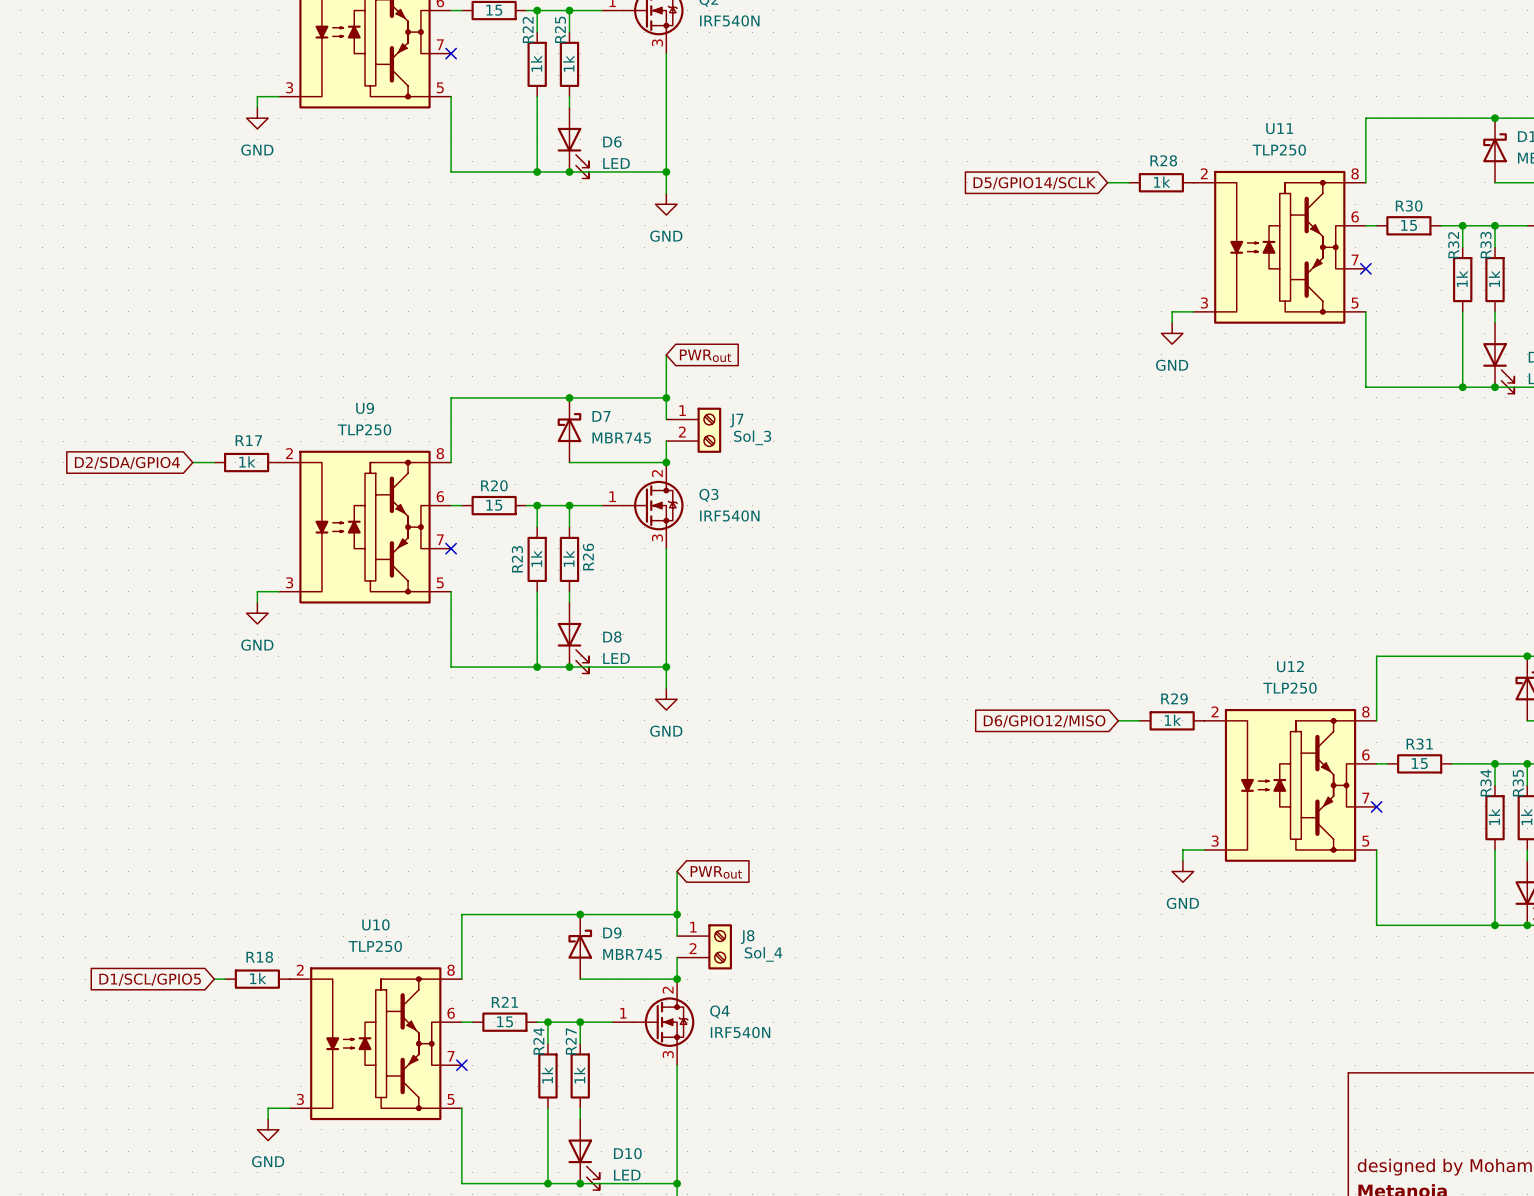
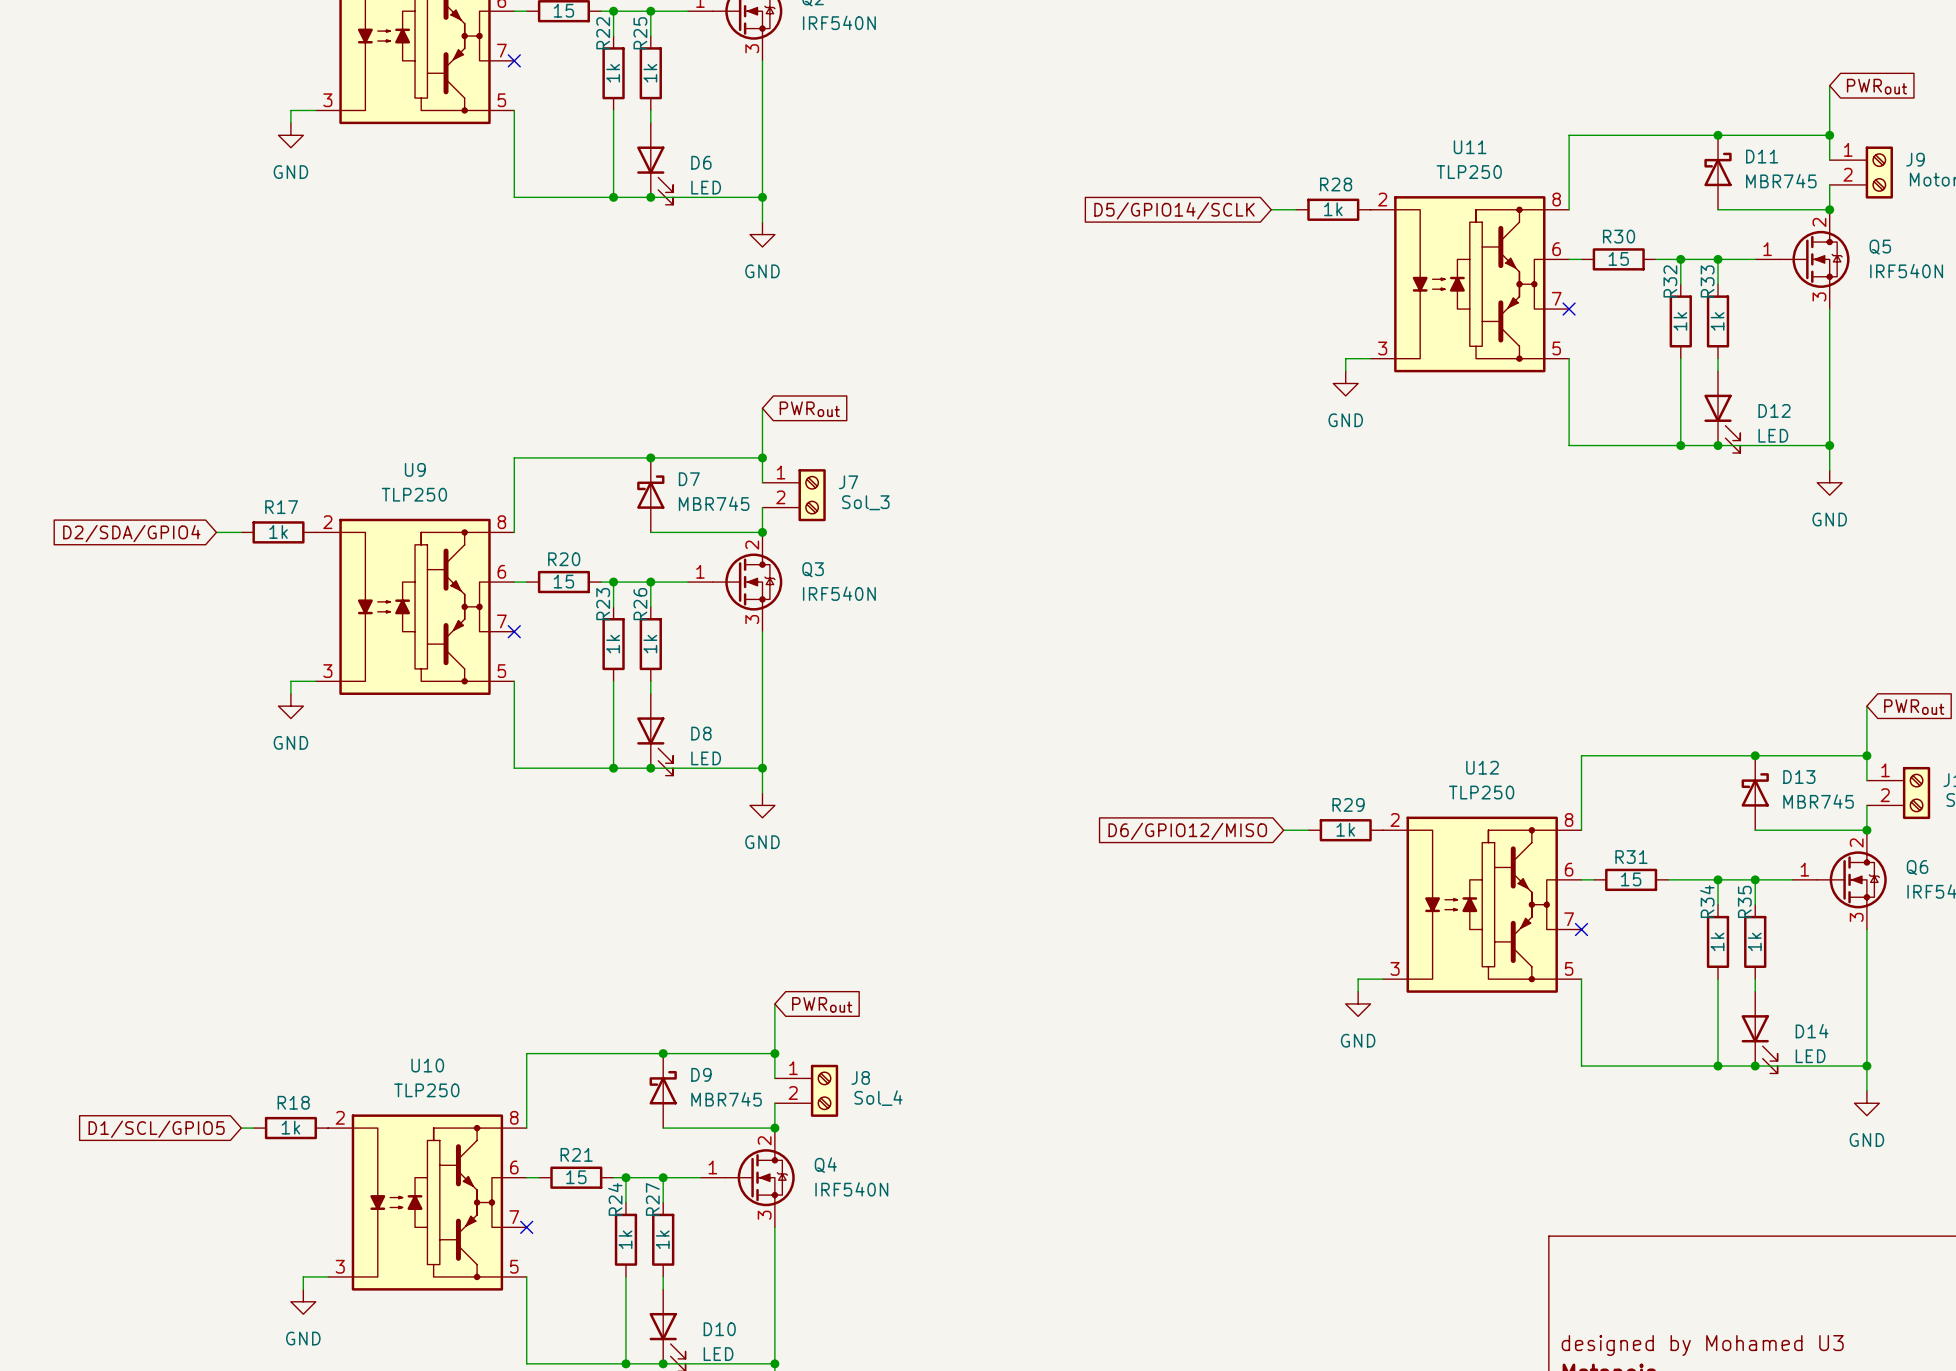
R26 name position: R26 (588, 556) -> R26 (640, 604)
R23 name position: R23 (517, 559) -> R23 (603, 604)

